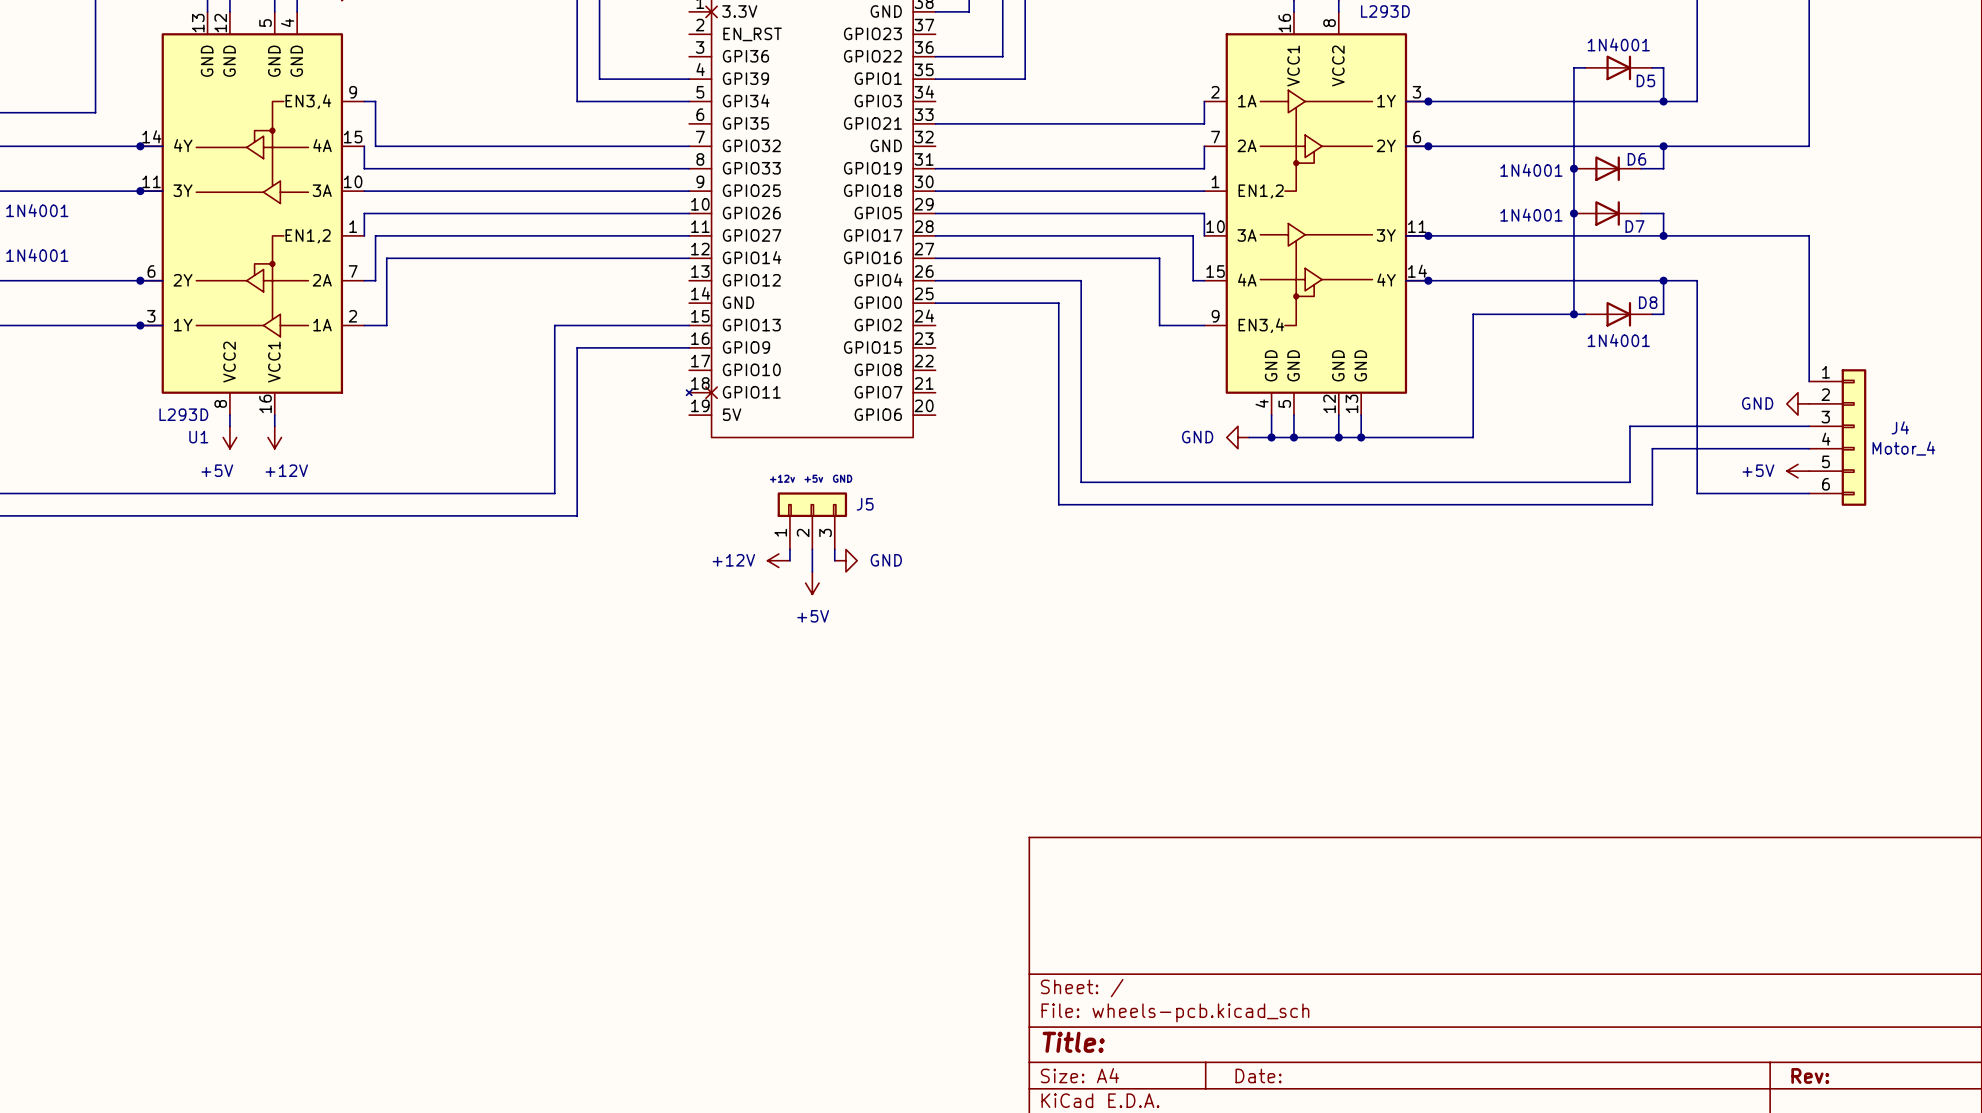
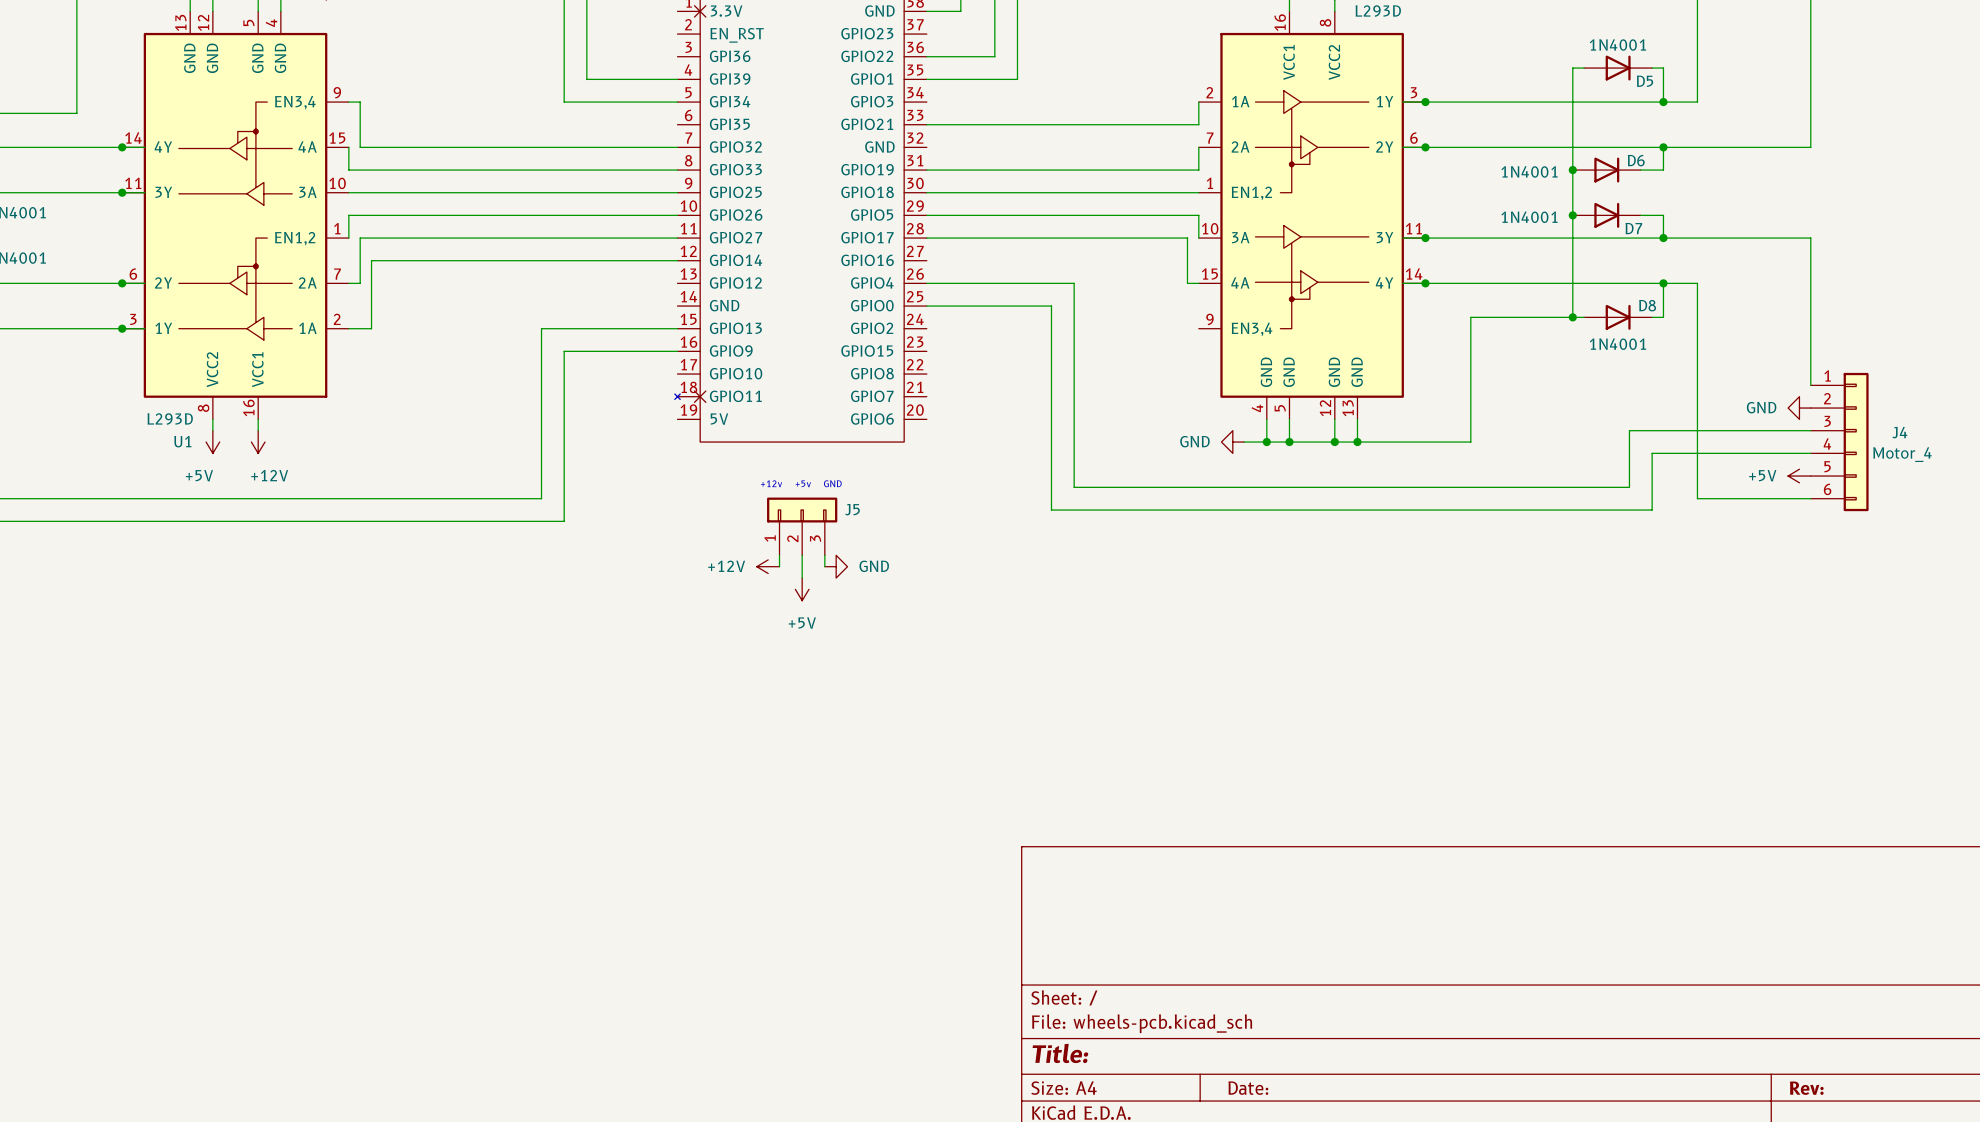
wire: (935, 258) (1159, 258) (1159, 325) (1204, 325) -> none

